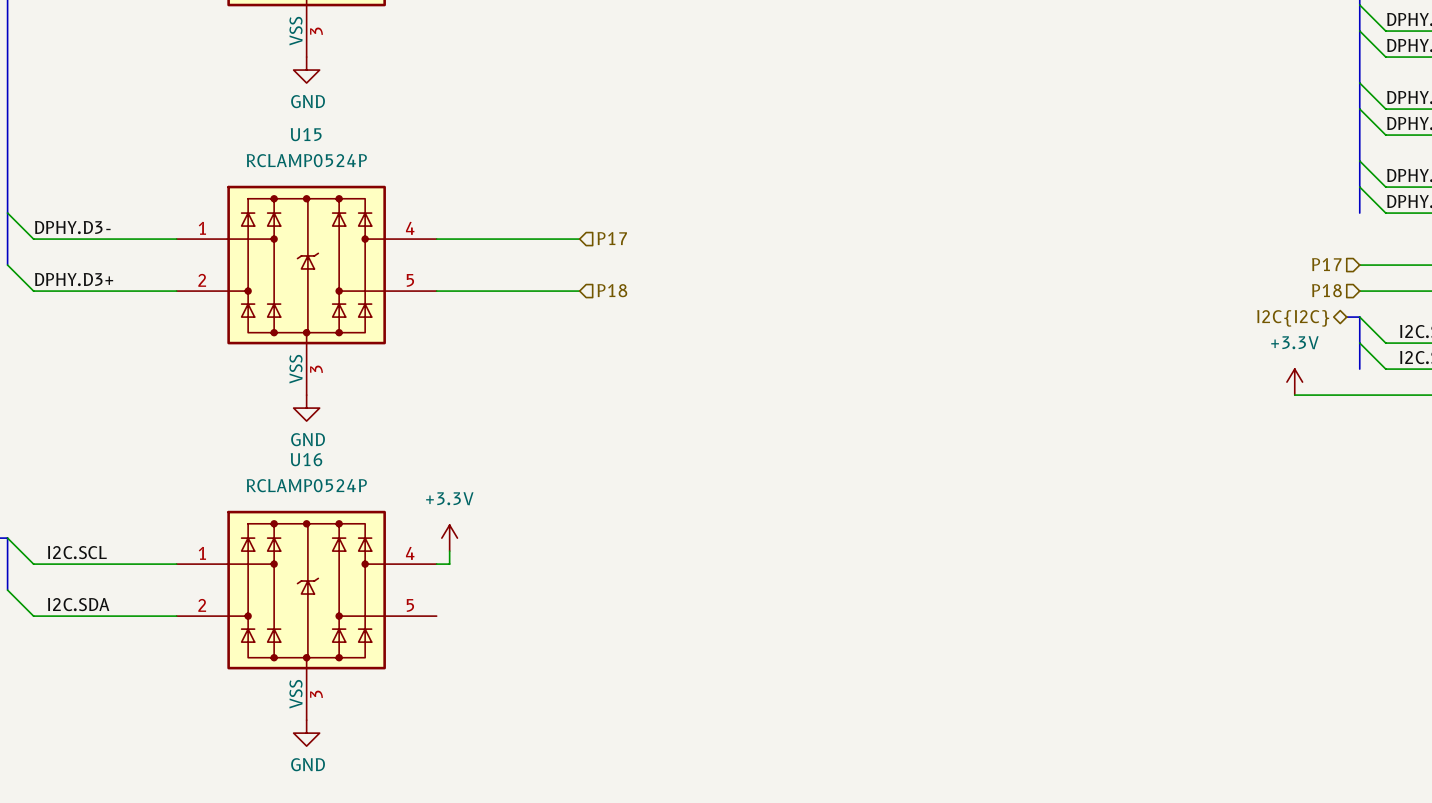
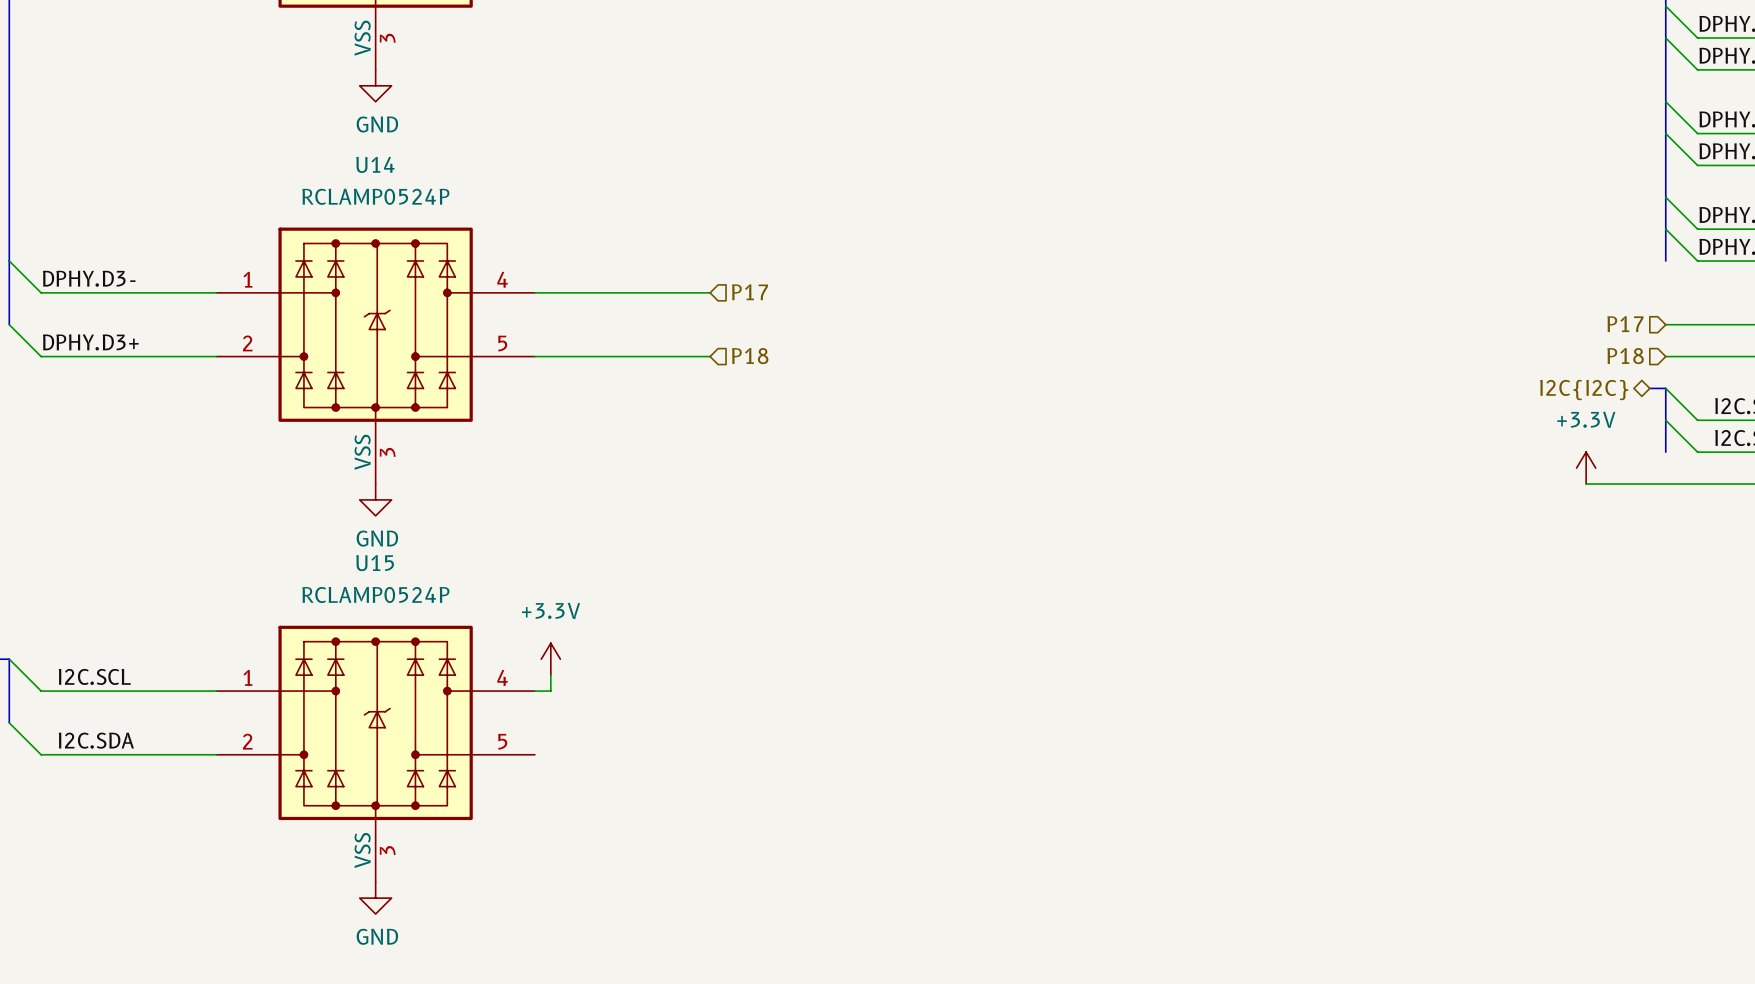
U15 name: U15 (306, 134) -> U14 (375, 164)
U16 name: U16 (306, 459) -> U15 (375, 563)

